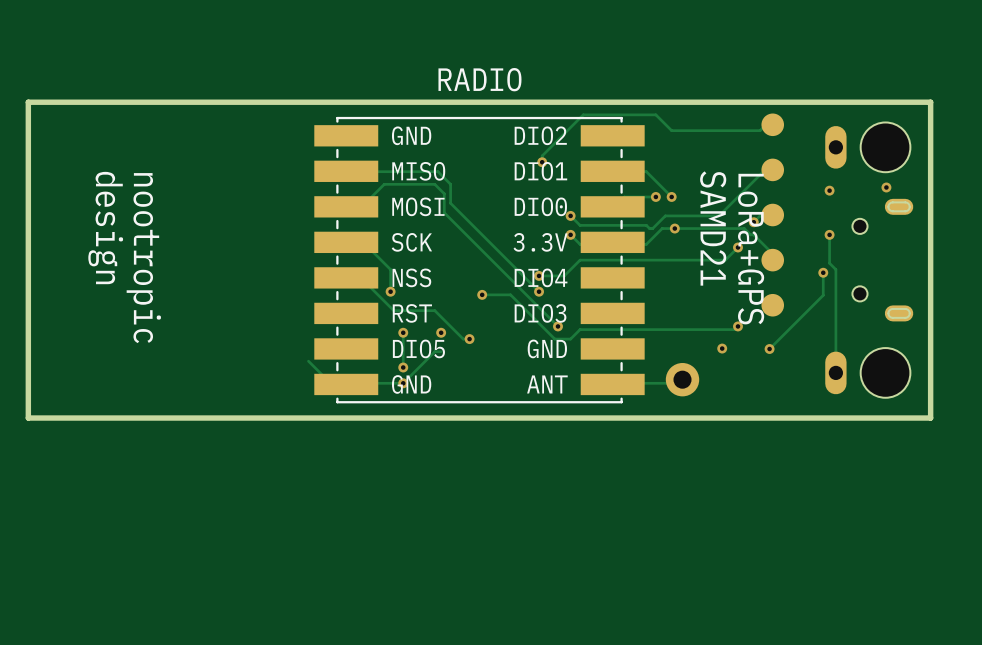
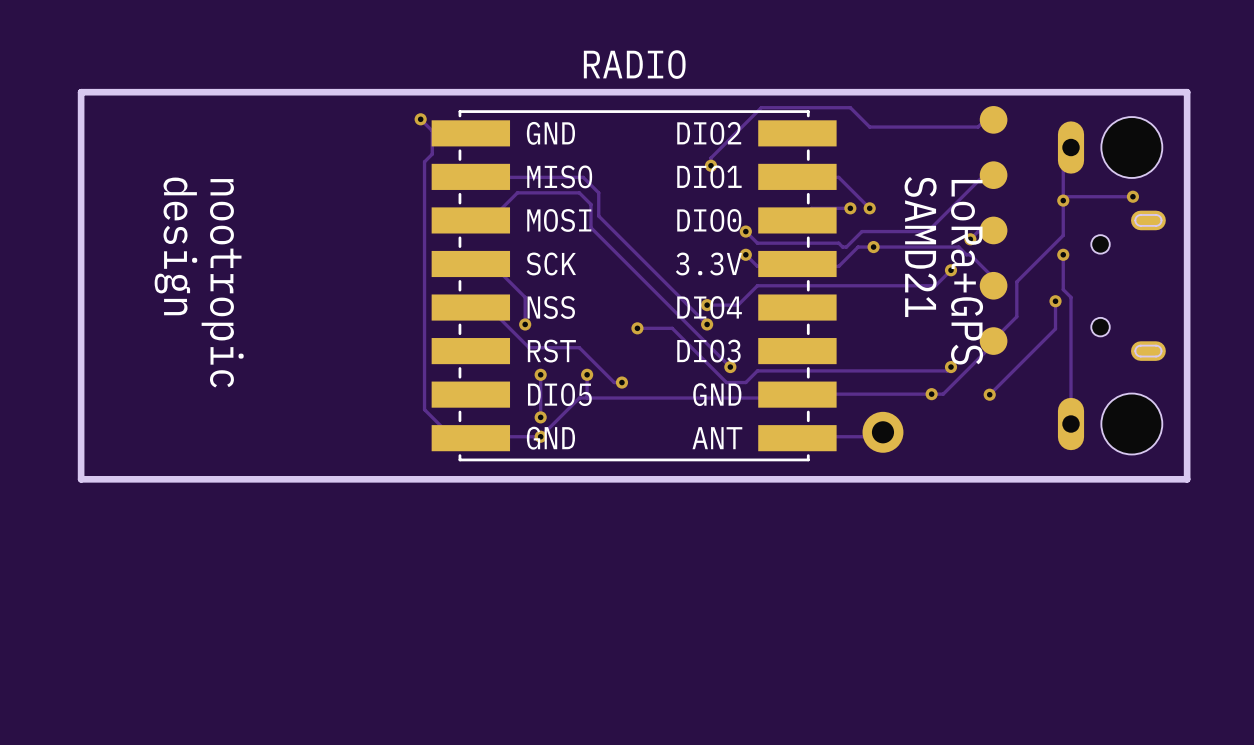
track: none -> (420, 119) (432, 130)
via: none -> (420, 119)
track: none -> (432, 130) (432, 154) (424, 161) (424, 409)
track: none -> (1063, 158) (1063, 196) (1132, 196)
track: none -> (1063, 200) (1063, 235) (1016, 281) (1016, 316) (993, 339) (993, 343) (943, 394) (800, 394)
track: none -> (587, 374) (587, 398) (796, 398)

